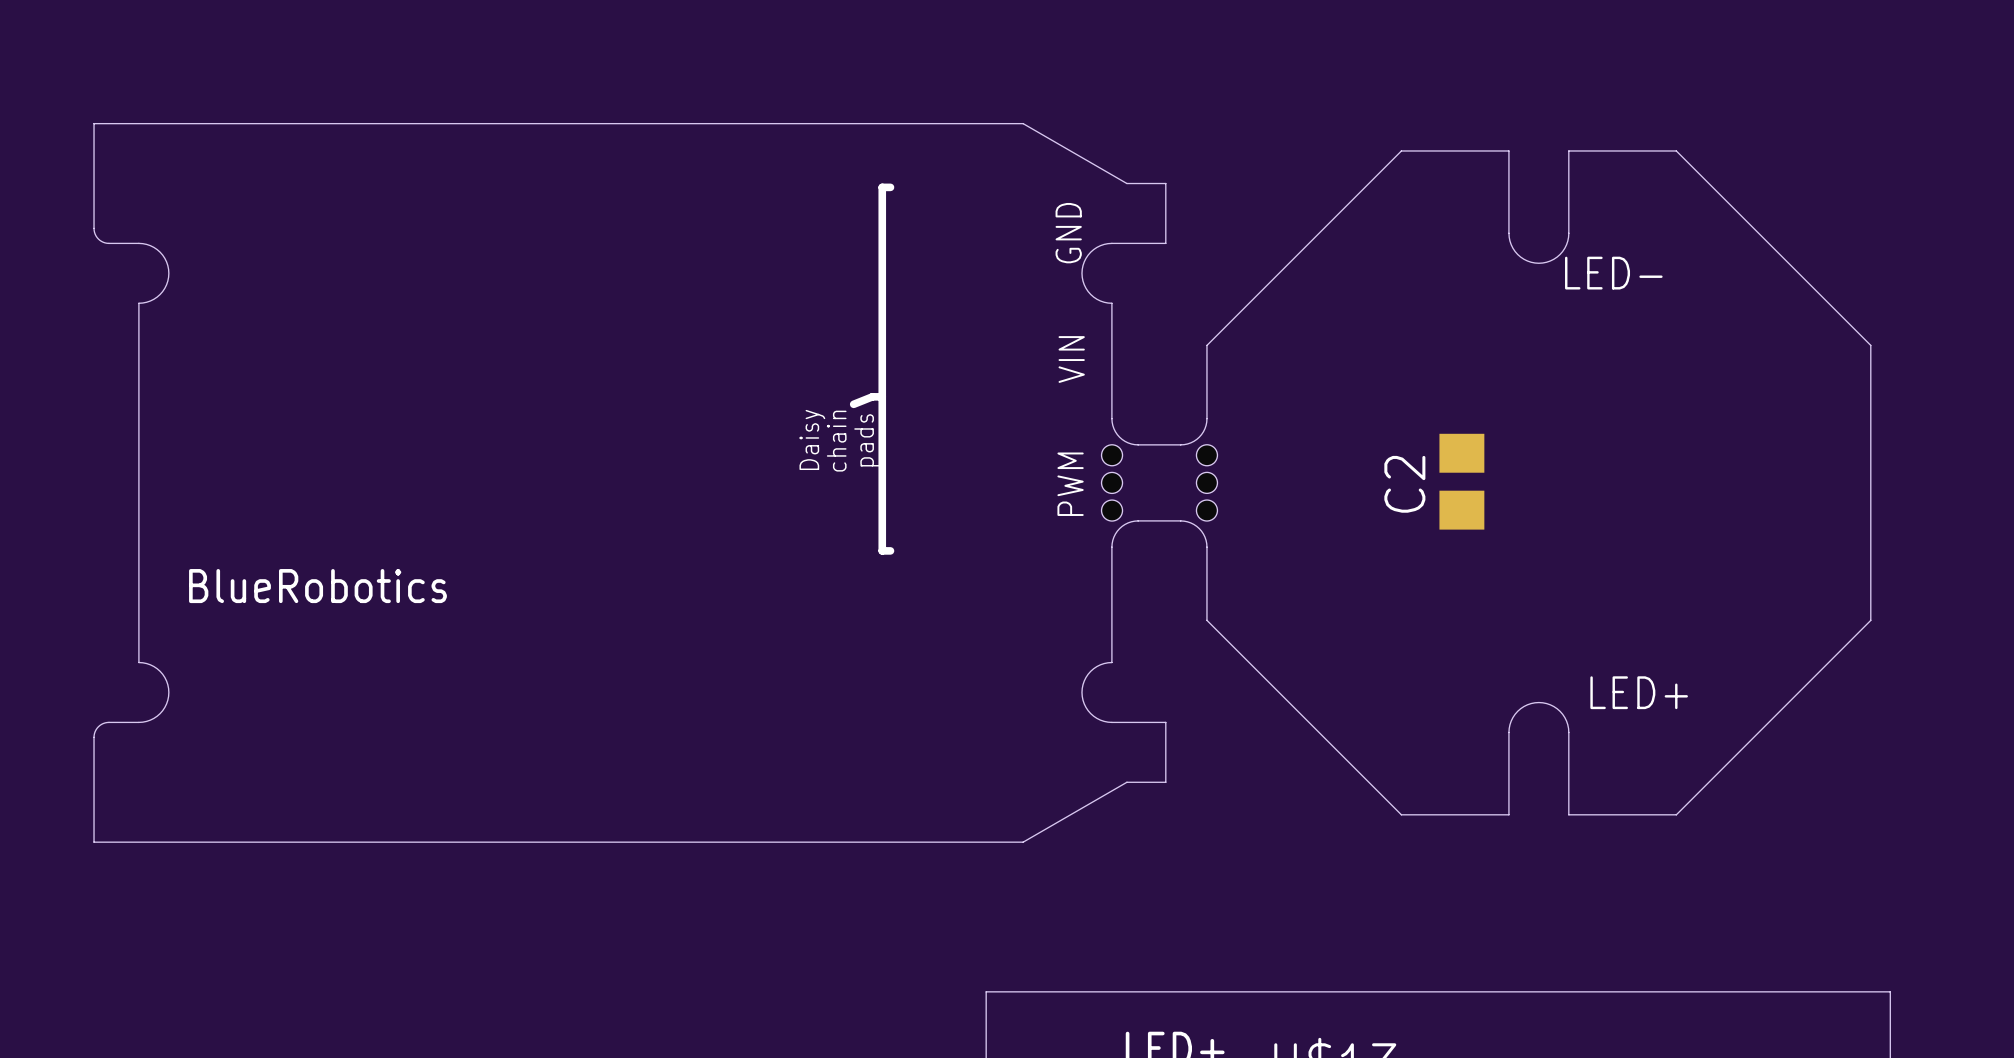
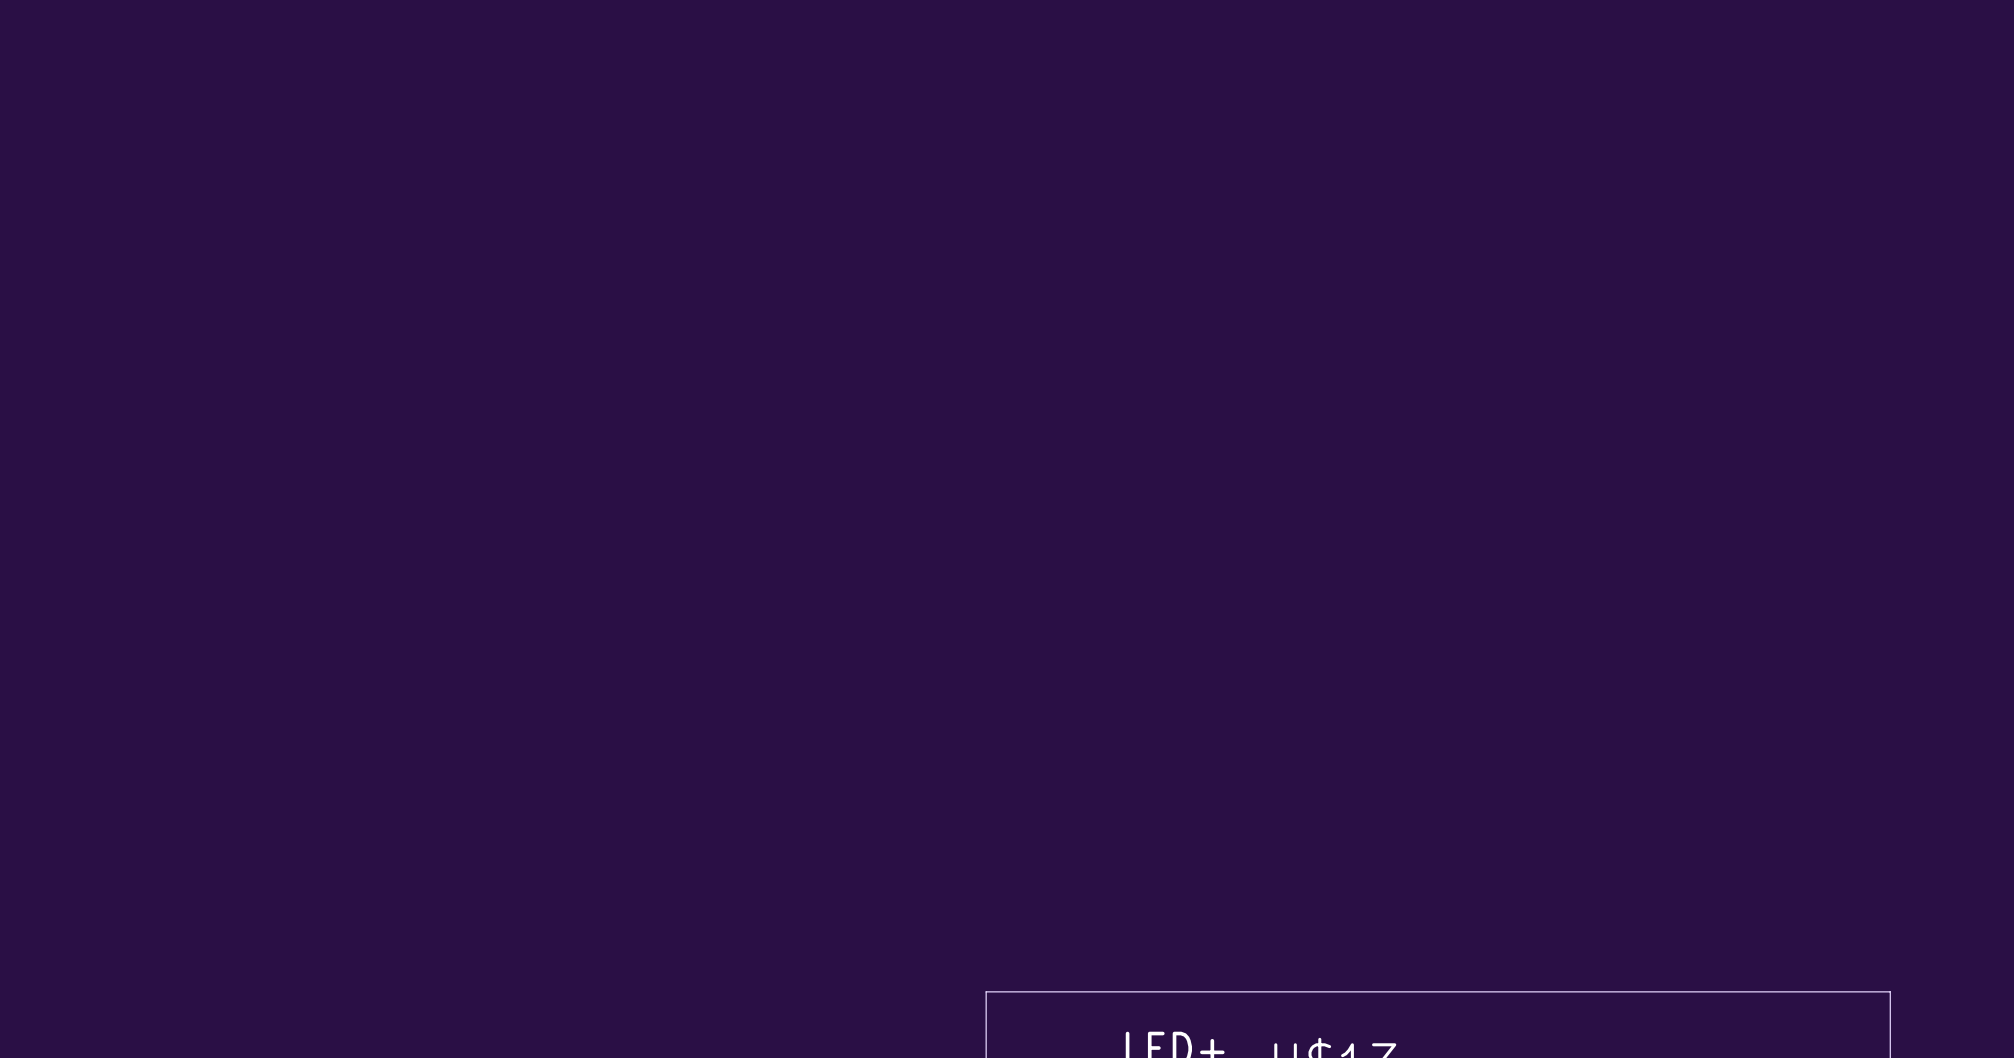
board edge: (1023, 123) (1126, 183) (1165, 183) (1165, 243) (1104, 244) (1093, 249) (1088, 255) (1082, 269) (1083, 281) (1088, 291) (1100, 300) (1111, 303) (1112, 425) (1122, 439) (1138, 444) (1184, 444) (1199, 437) (1206, 422) (1206, 345) (1401, 150) (1508, 150) (1509, 241) (1515, 251) (1520, 257) (1531, 262) (1538, 263) (1546, 262) (1557, 257) (1562, 251) (1567, 241) (1568, 150) (1676, 150) (1870, 345) (1870, 620) (1676, 814) (1568, 814) (1567, 724) (1562, 714) (1557, 708) (1546, 703) (1538, 702) (1531, 703) (1520, 708) (1515, 714) (1509, 724) (1508, 814) (1401, 814) (1206, 620) (1206, 543) (1199, 528) (1184, 521) (1134, 521) (1119, 528) (1112, 543) (1111, 662) (1100, 664) (1088, 674) (1083, 684) (1082, 696) (1088, 710) (1093, 716) (1104, 721) (1165, 722) (1165, 782) (1126, 782) (1023, 842) (94, 842) (94, 737) (96, 729) (105, 722) (142, 722) (153, 718) (164, 707) (168, 692) (166, 681) (160, 671) (150, 664) (138, 662) (138, 303) (150, 300) (162, 291) (167, 281) (168, 269) (162, 255) (150, 245) (138, 243) (107, 243) (99, 240) (96, 235) (94, 228) (94, 123) (1023, 123) -> none
line: (890, 187) (882, 187) (882, 550) (890, 550) -> none
text: GND (1068, 233) -> none
text: LED- (1613, 273) -> none
text: VIN (1071, 359) -> none
line: (882, 396) (872, 396) (853, 404) -> none
text: Daisy (812, 439) -> none
text: pads (867, 440) -> none
text: chain (836, 441) -> none
hole: (1112, 455) -> none
hole: (1206, 455) -> none
C2: (1461, 481) -> none
hole: (1112, 482) -> none
hole: (1206, 482) -> none
text: PWM (1070, 484) -> none
hole: (1112, 510) -> none
hole: (1206, 510) -> none
text: BlueRobotics (317, 586) -> none
text: LED+ (1639, 692) -> none

